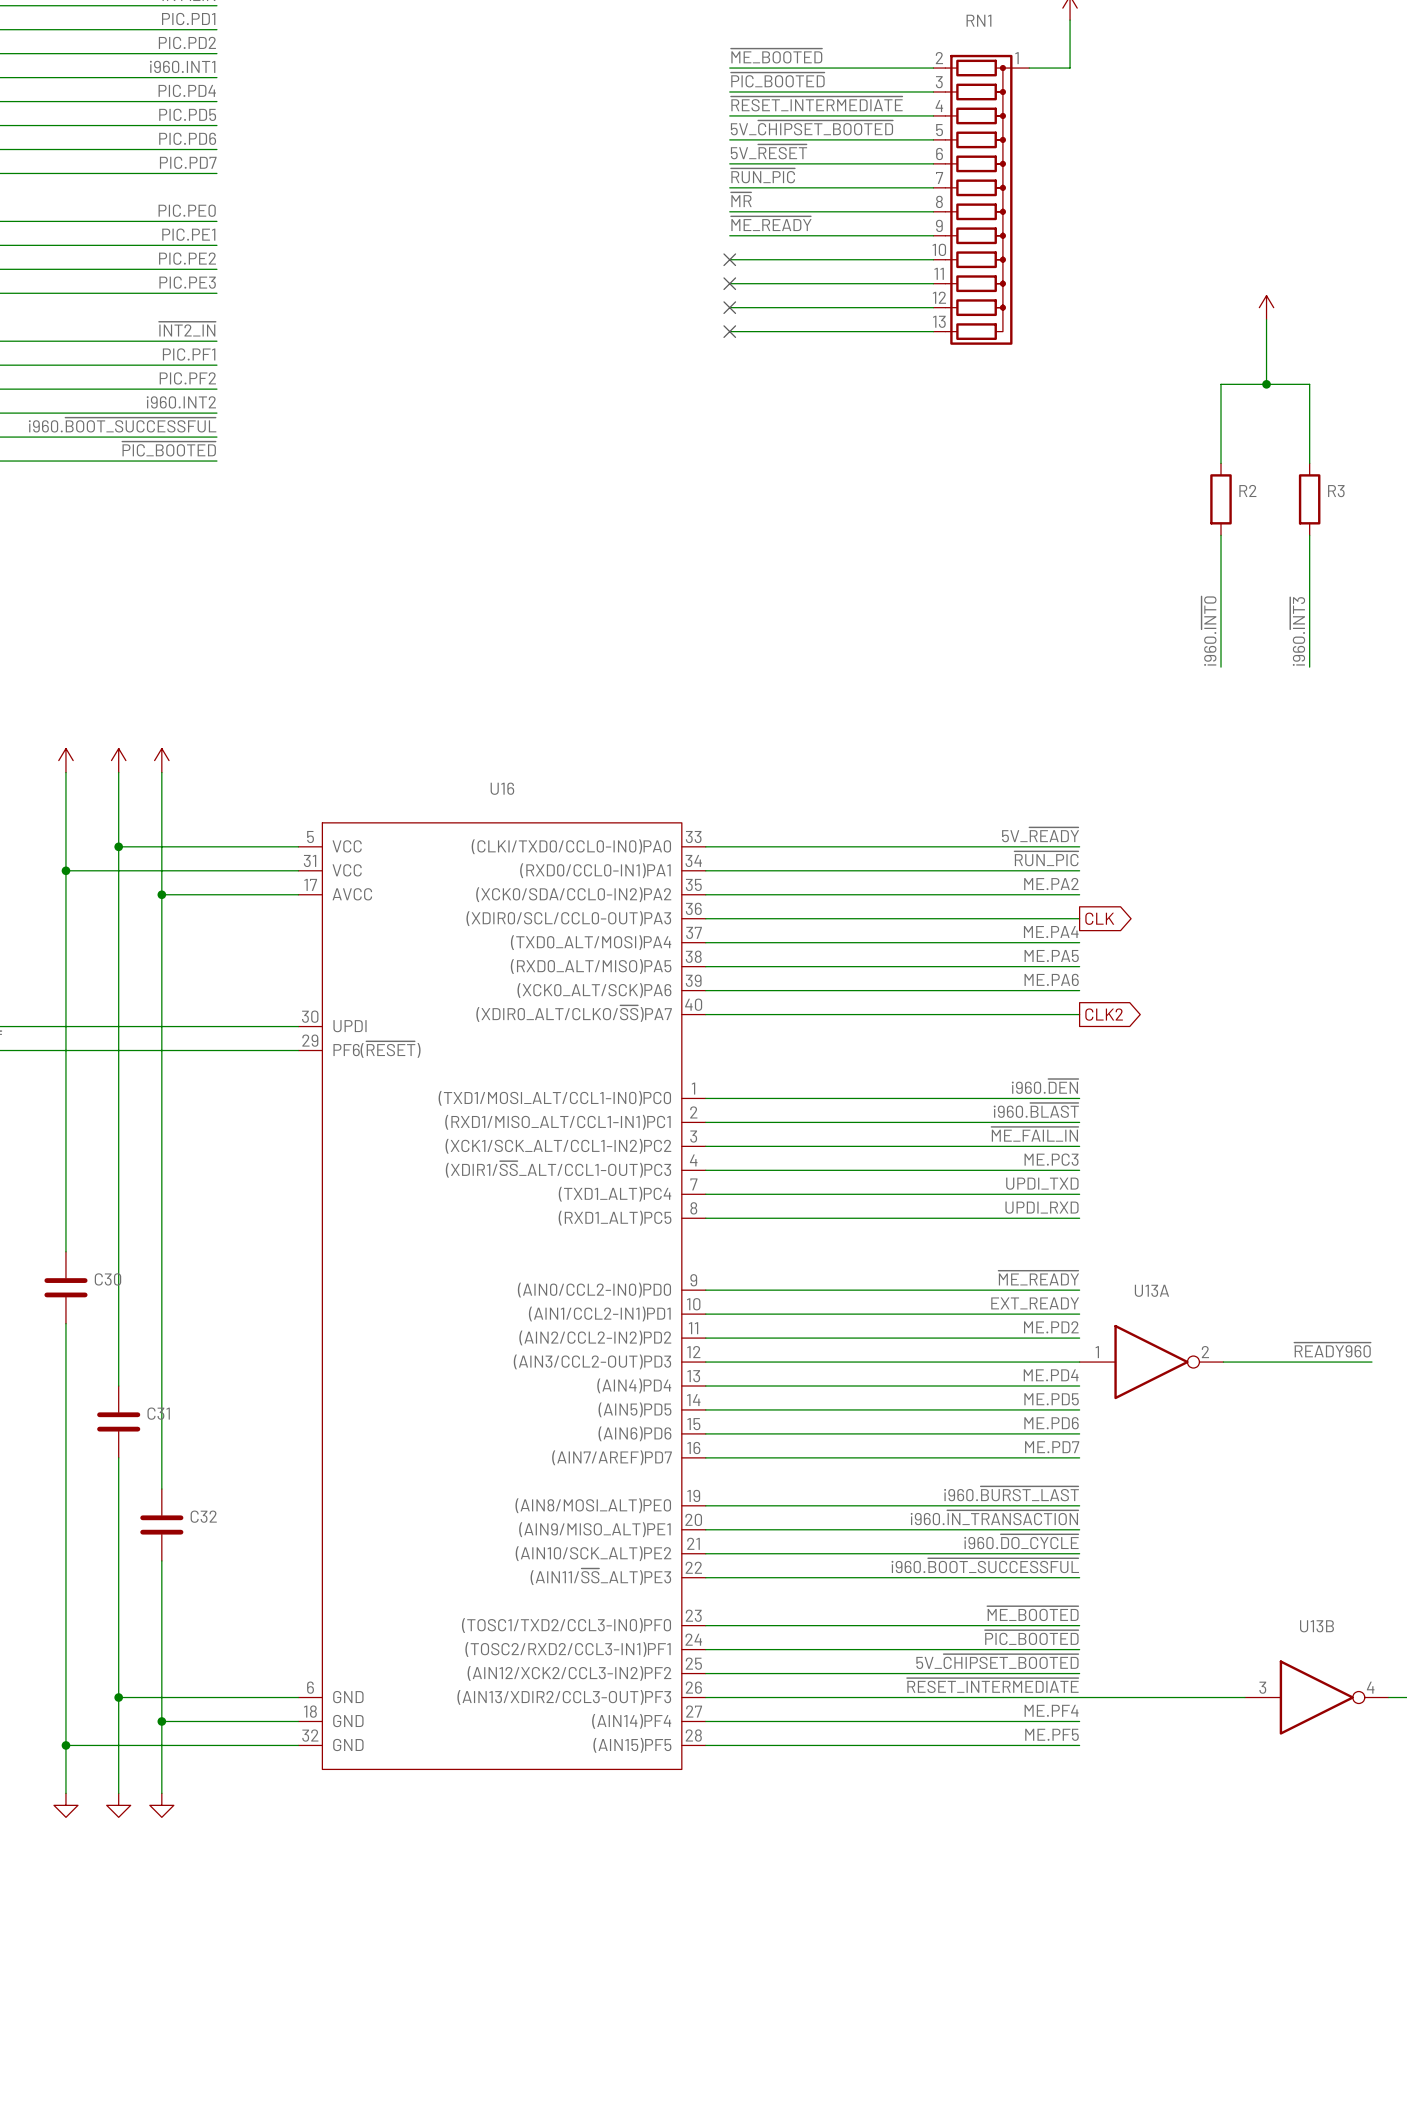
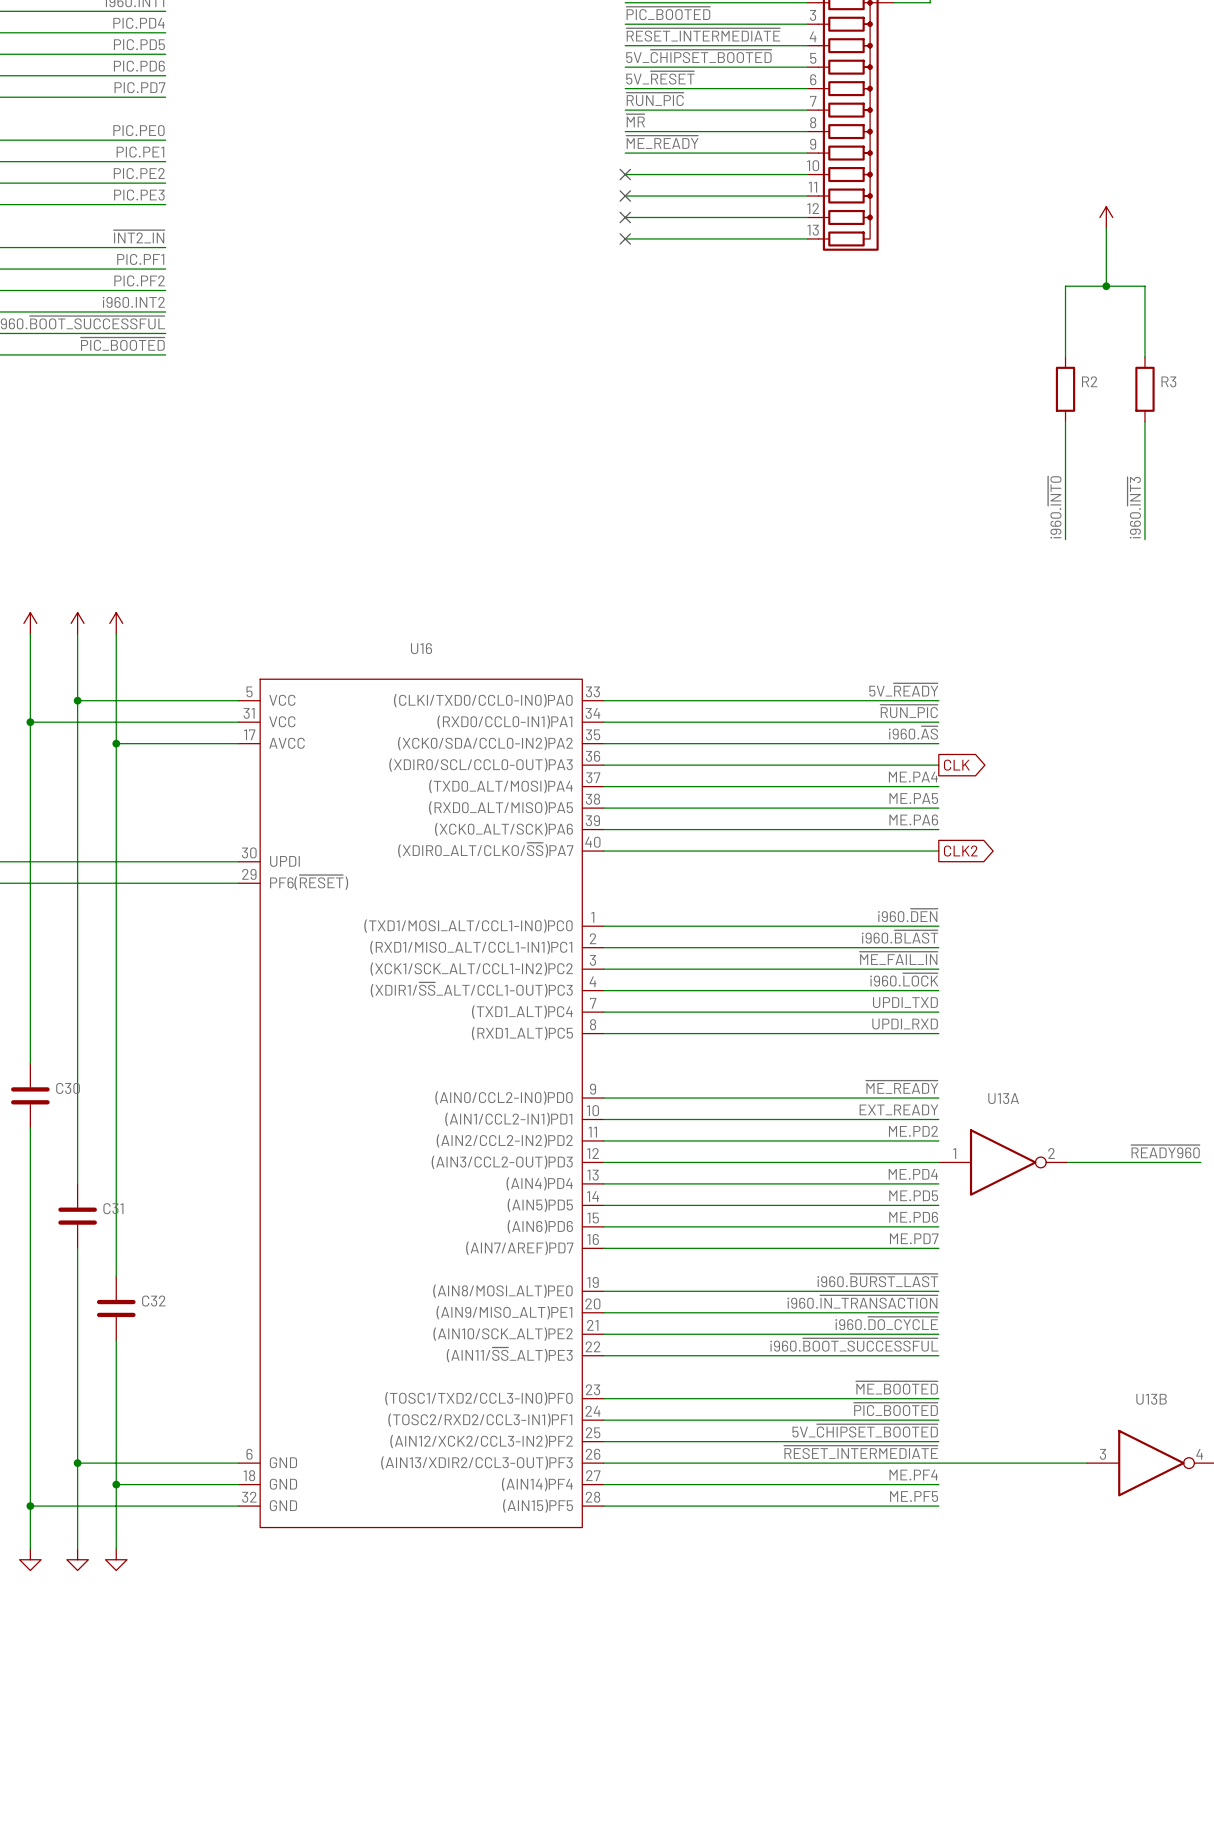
label: ME.PA2 (1051, 884) -> i960.~{AS} (913, 732)
label: ME.PC3 (1051, 1159) -> i960.~{LOCK} (904, 979)

